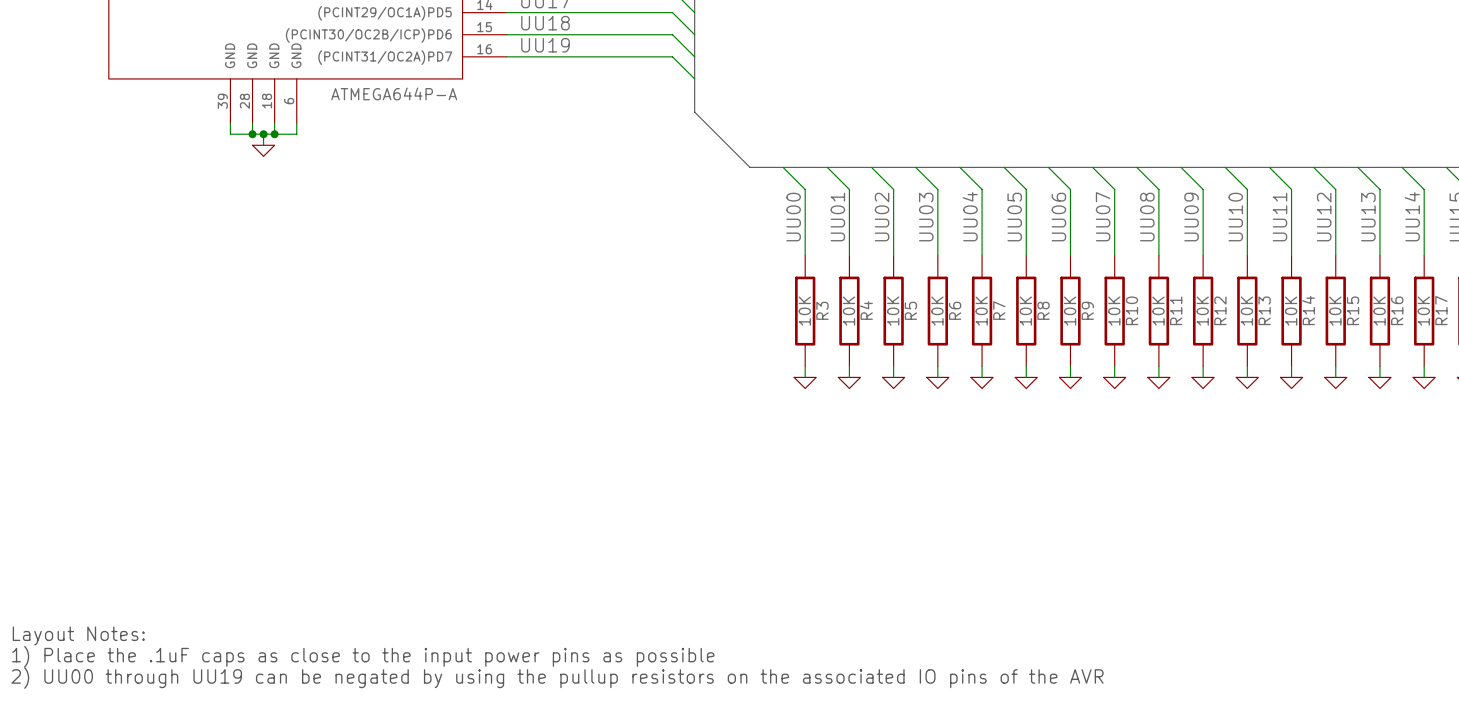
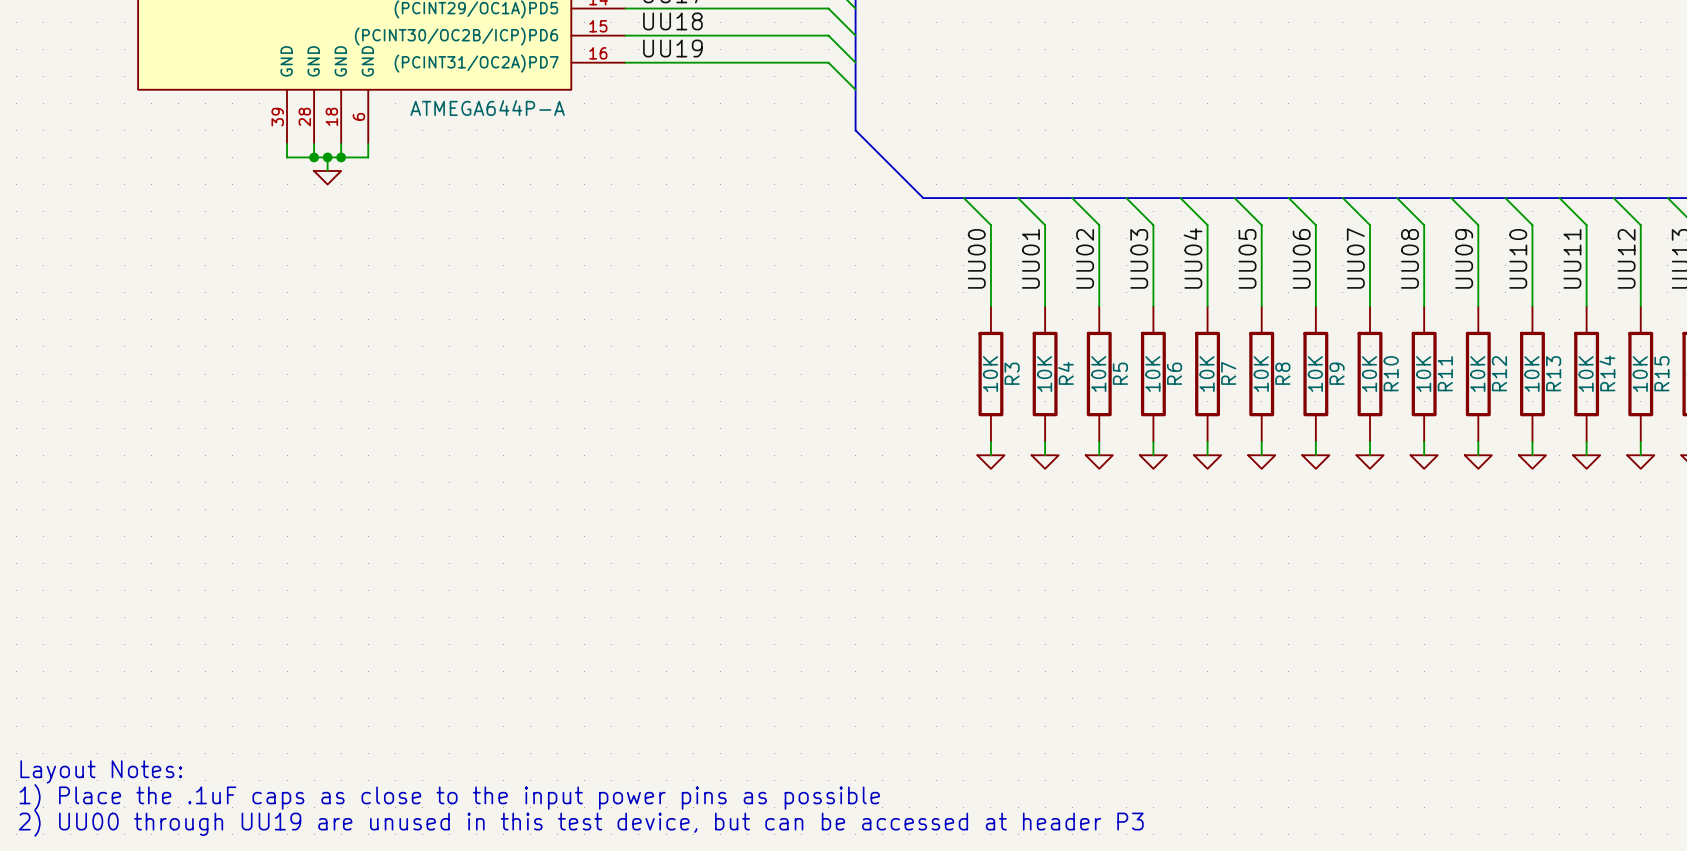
text: 2) UU00 through UU19 can be negated by using the pullup resistors on the associated IO pins of the AVR (557, 678) -> 2) UU00 through UU19 are unused in this test device, but can be accessed at header P3 (581, 823)

